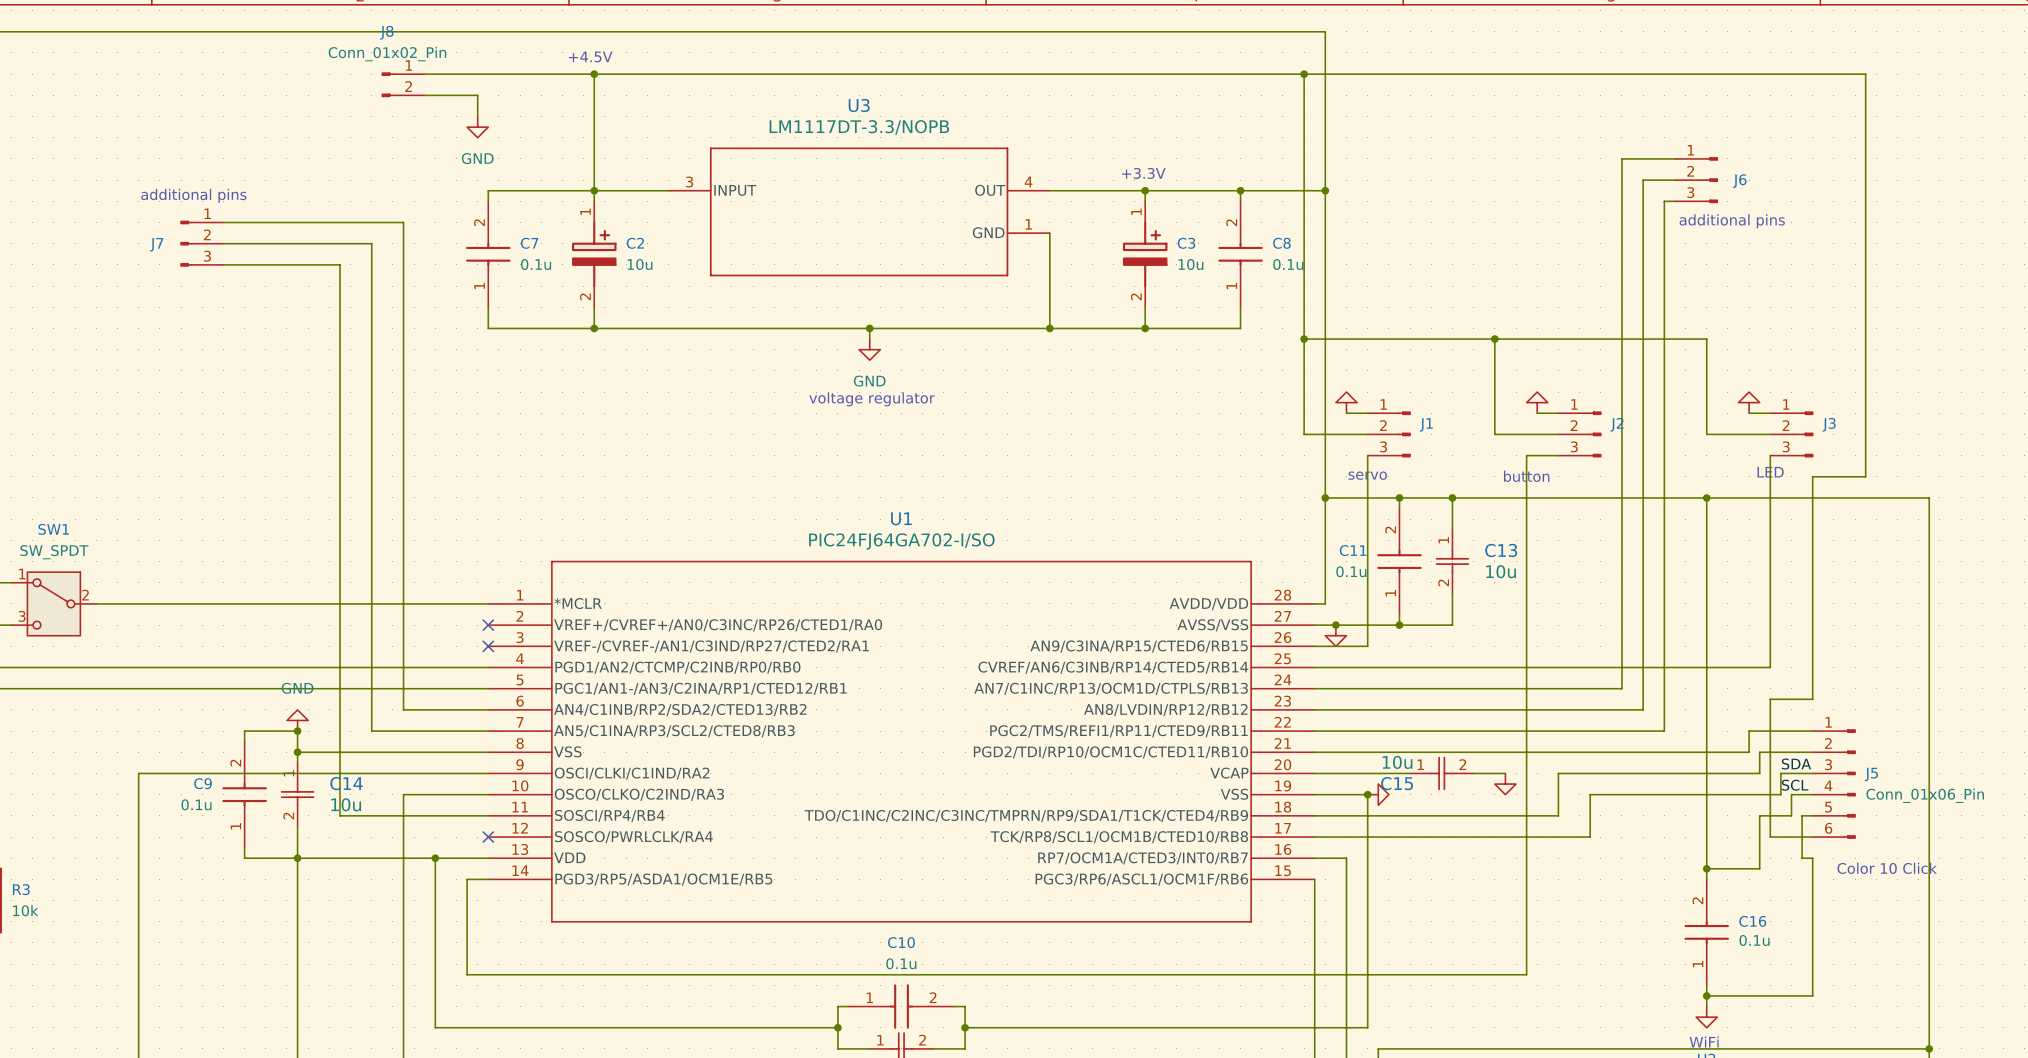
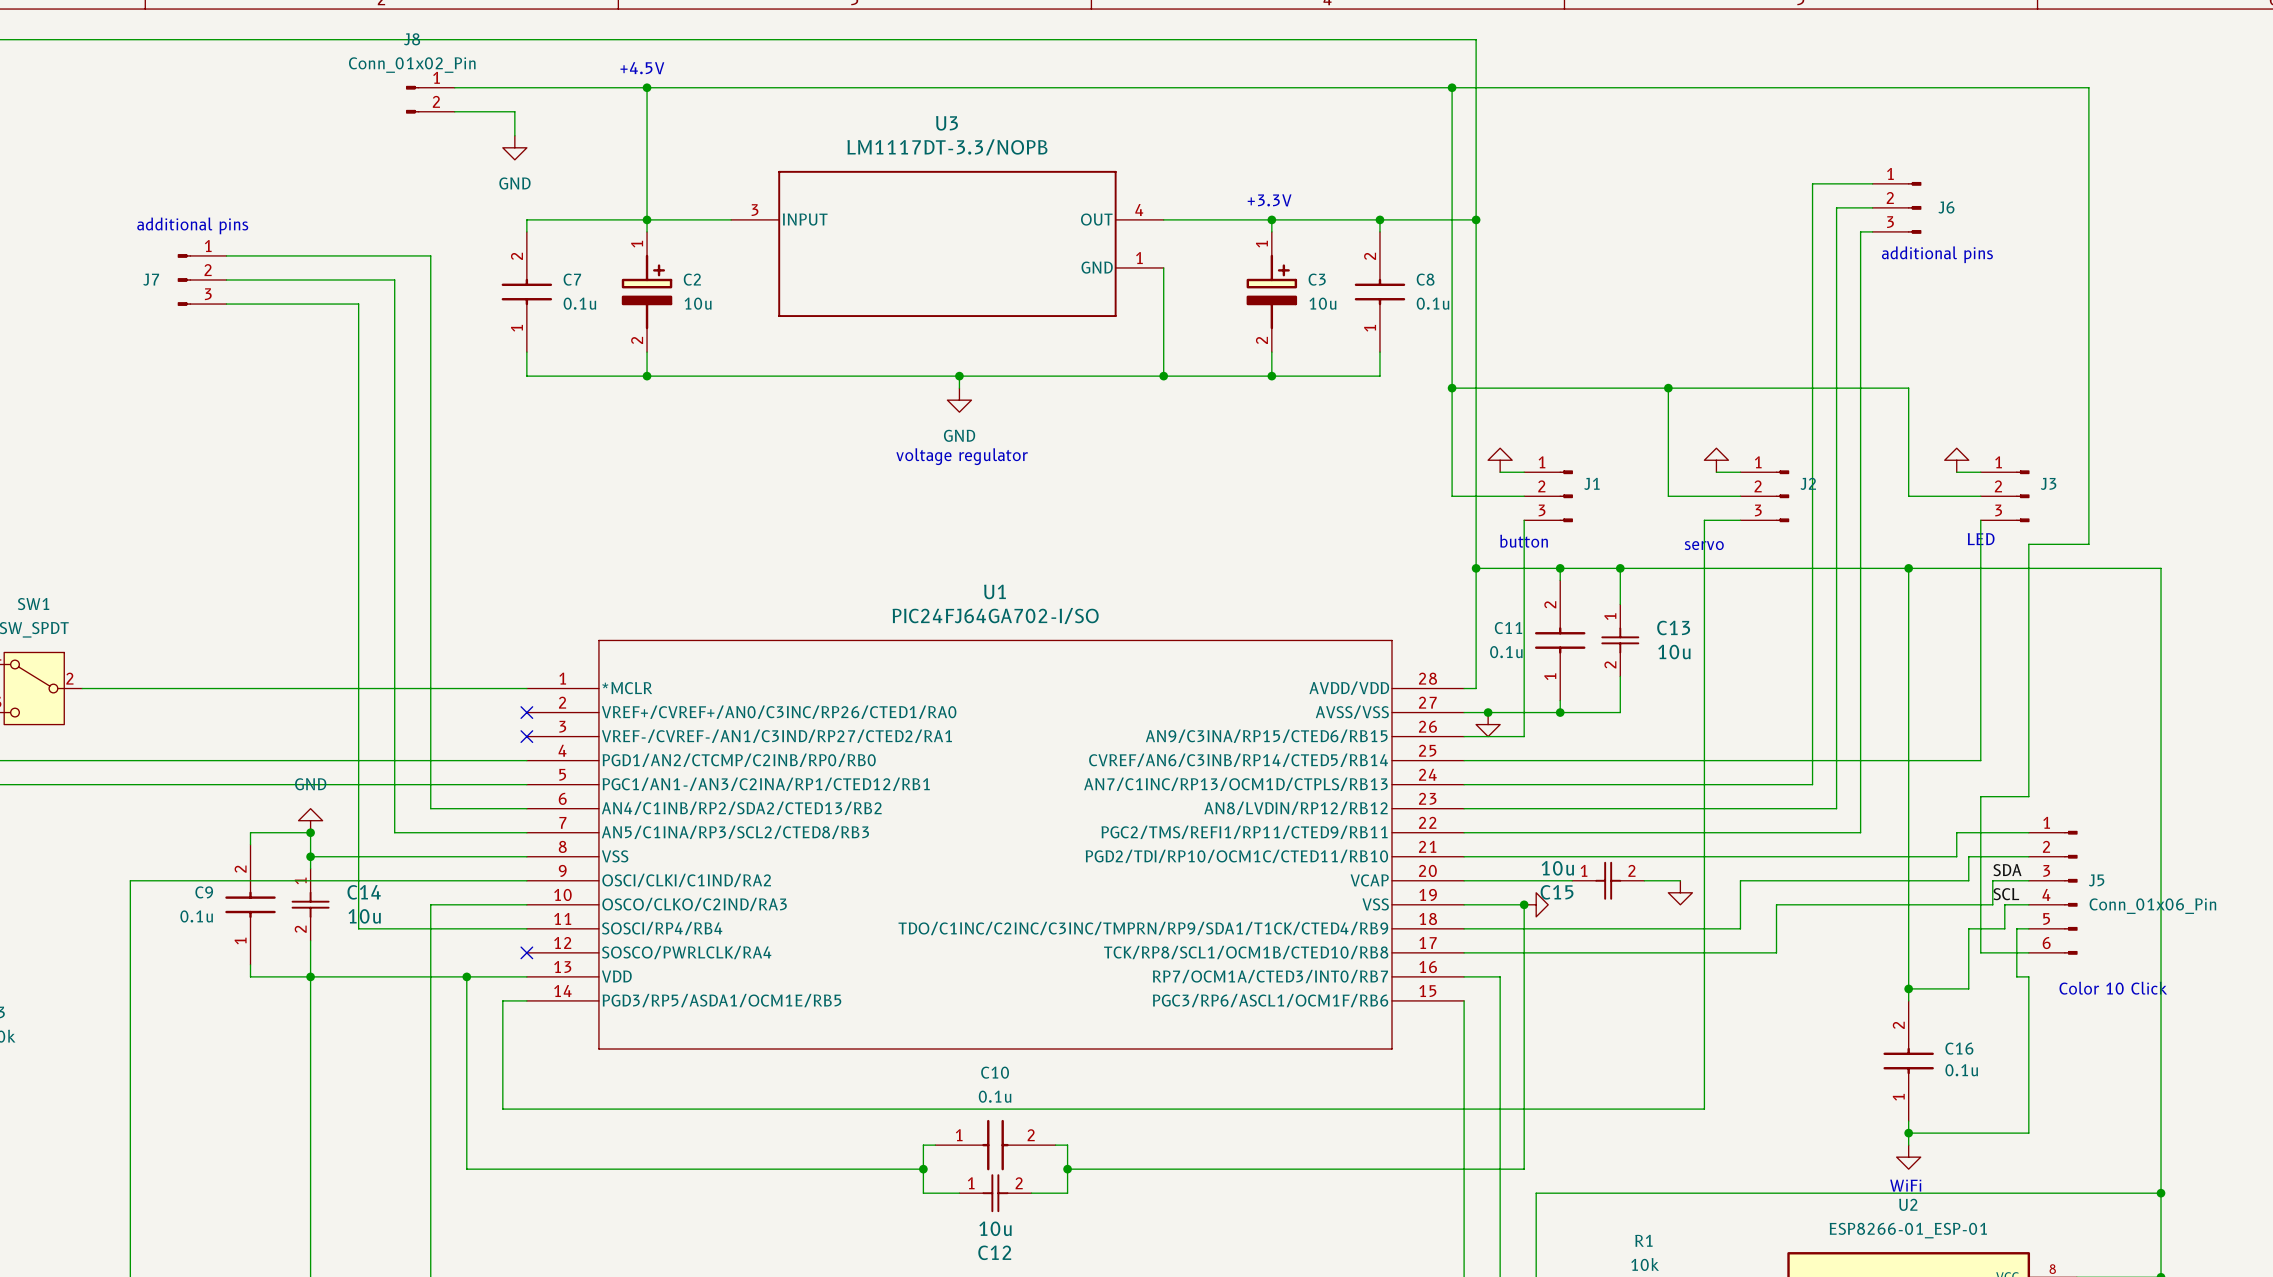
text: servo (1367, 475) -> button (1524, 541)
text: button (1526, 476) -> servo (1704, 545)

